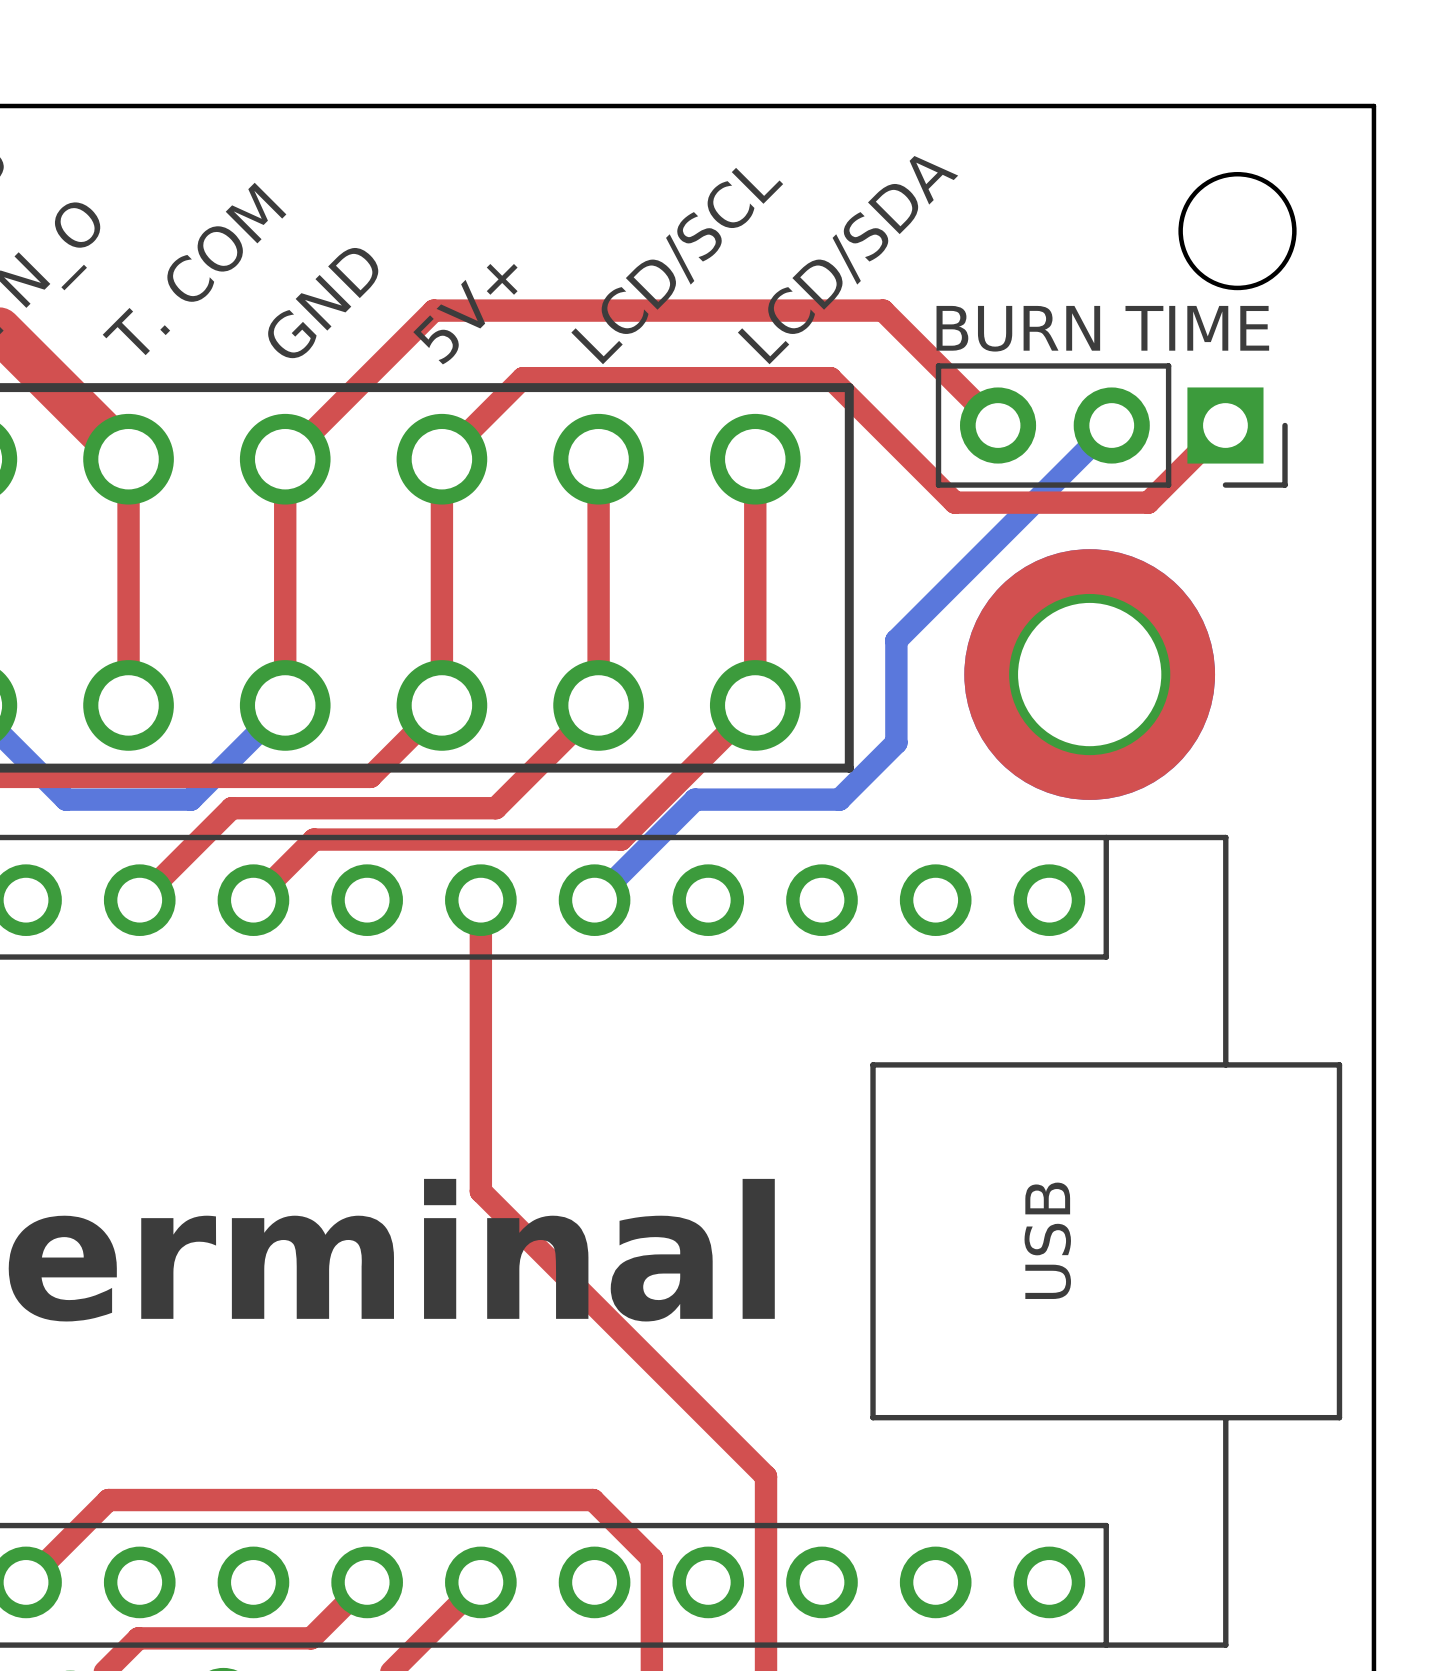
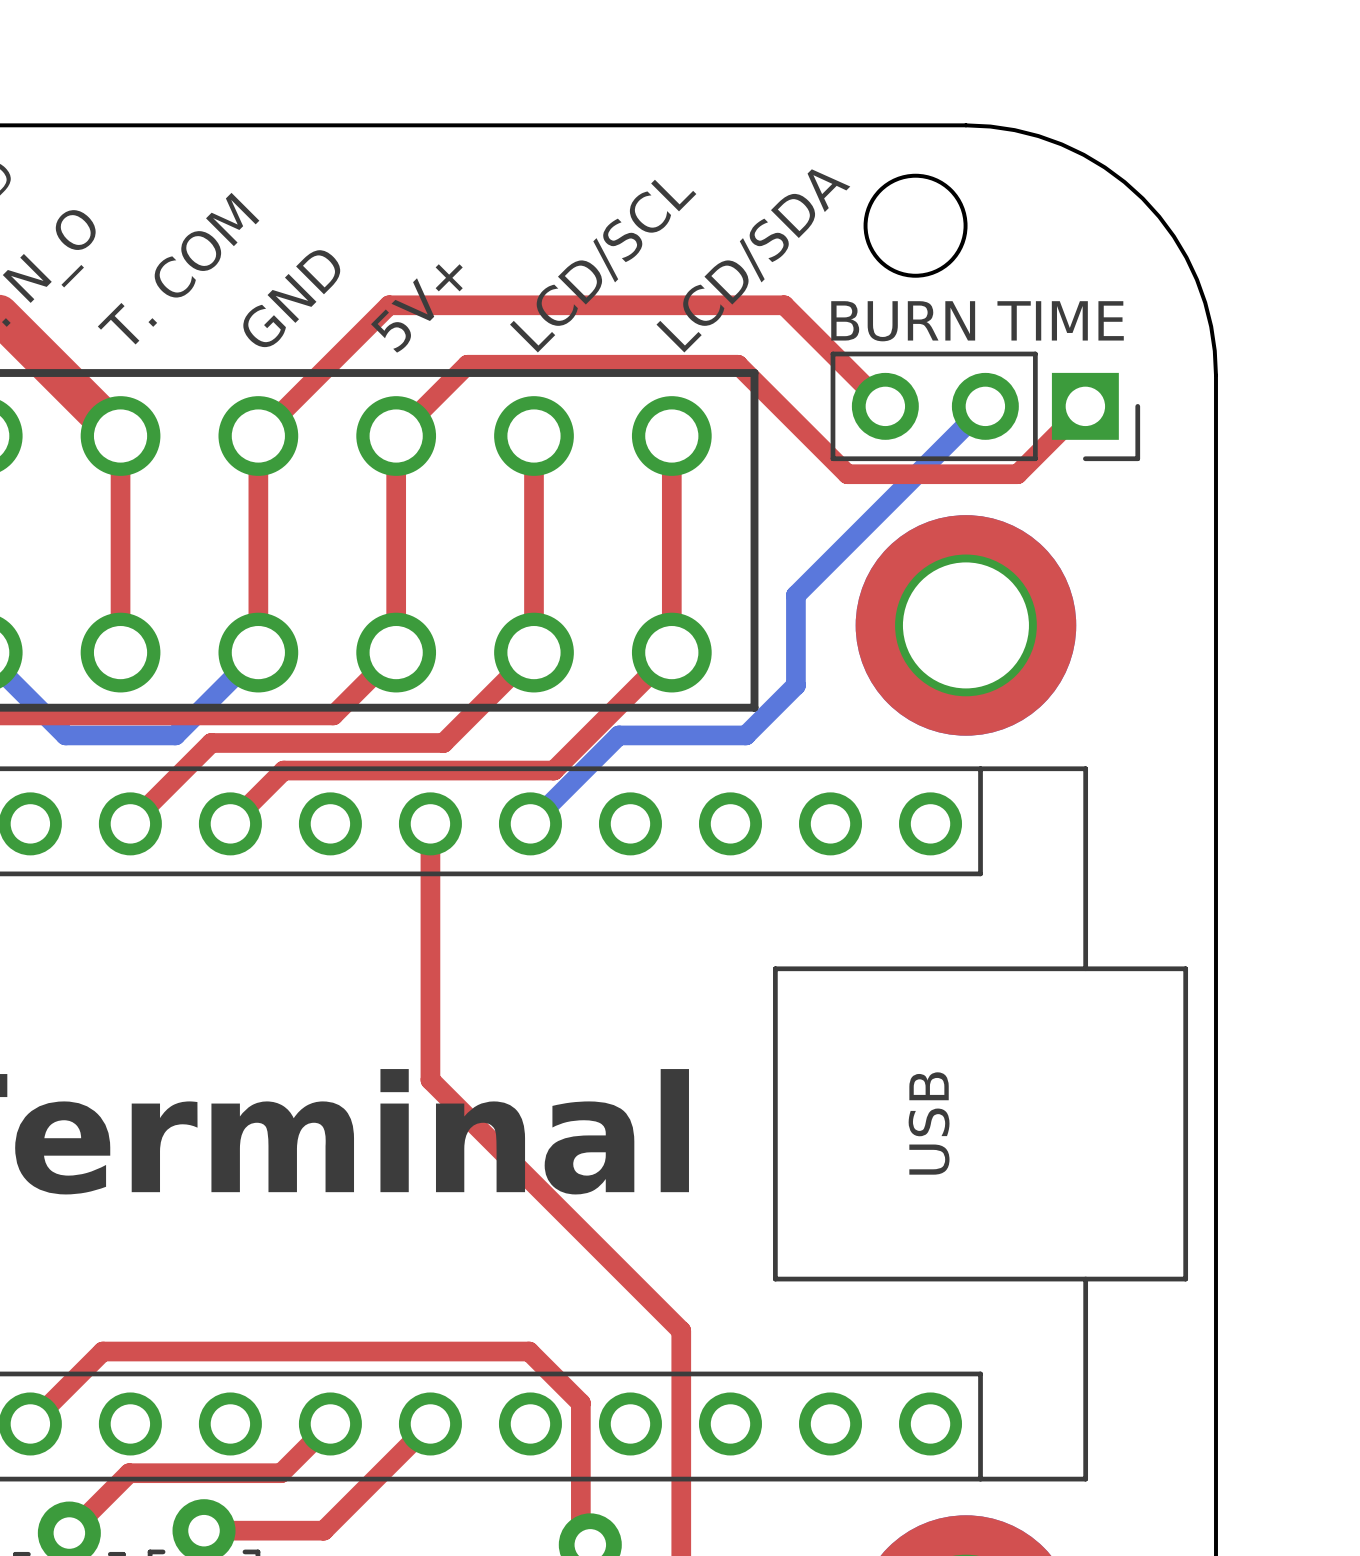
board edge: (1089, 106) (1373, 106) (1373, 390) -> (965, 125) (1014, 130) (1061, 144) (1104, 167) (1142, 198) (1173, 236) (1196, 279) (1211, 326) (1215, 375)
round board edge position: (1237, 231) -> (915, 225)

